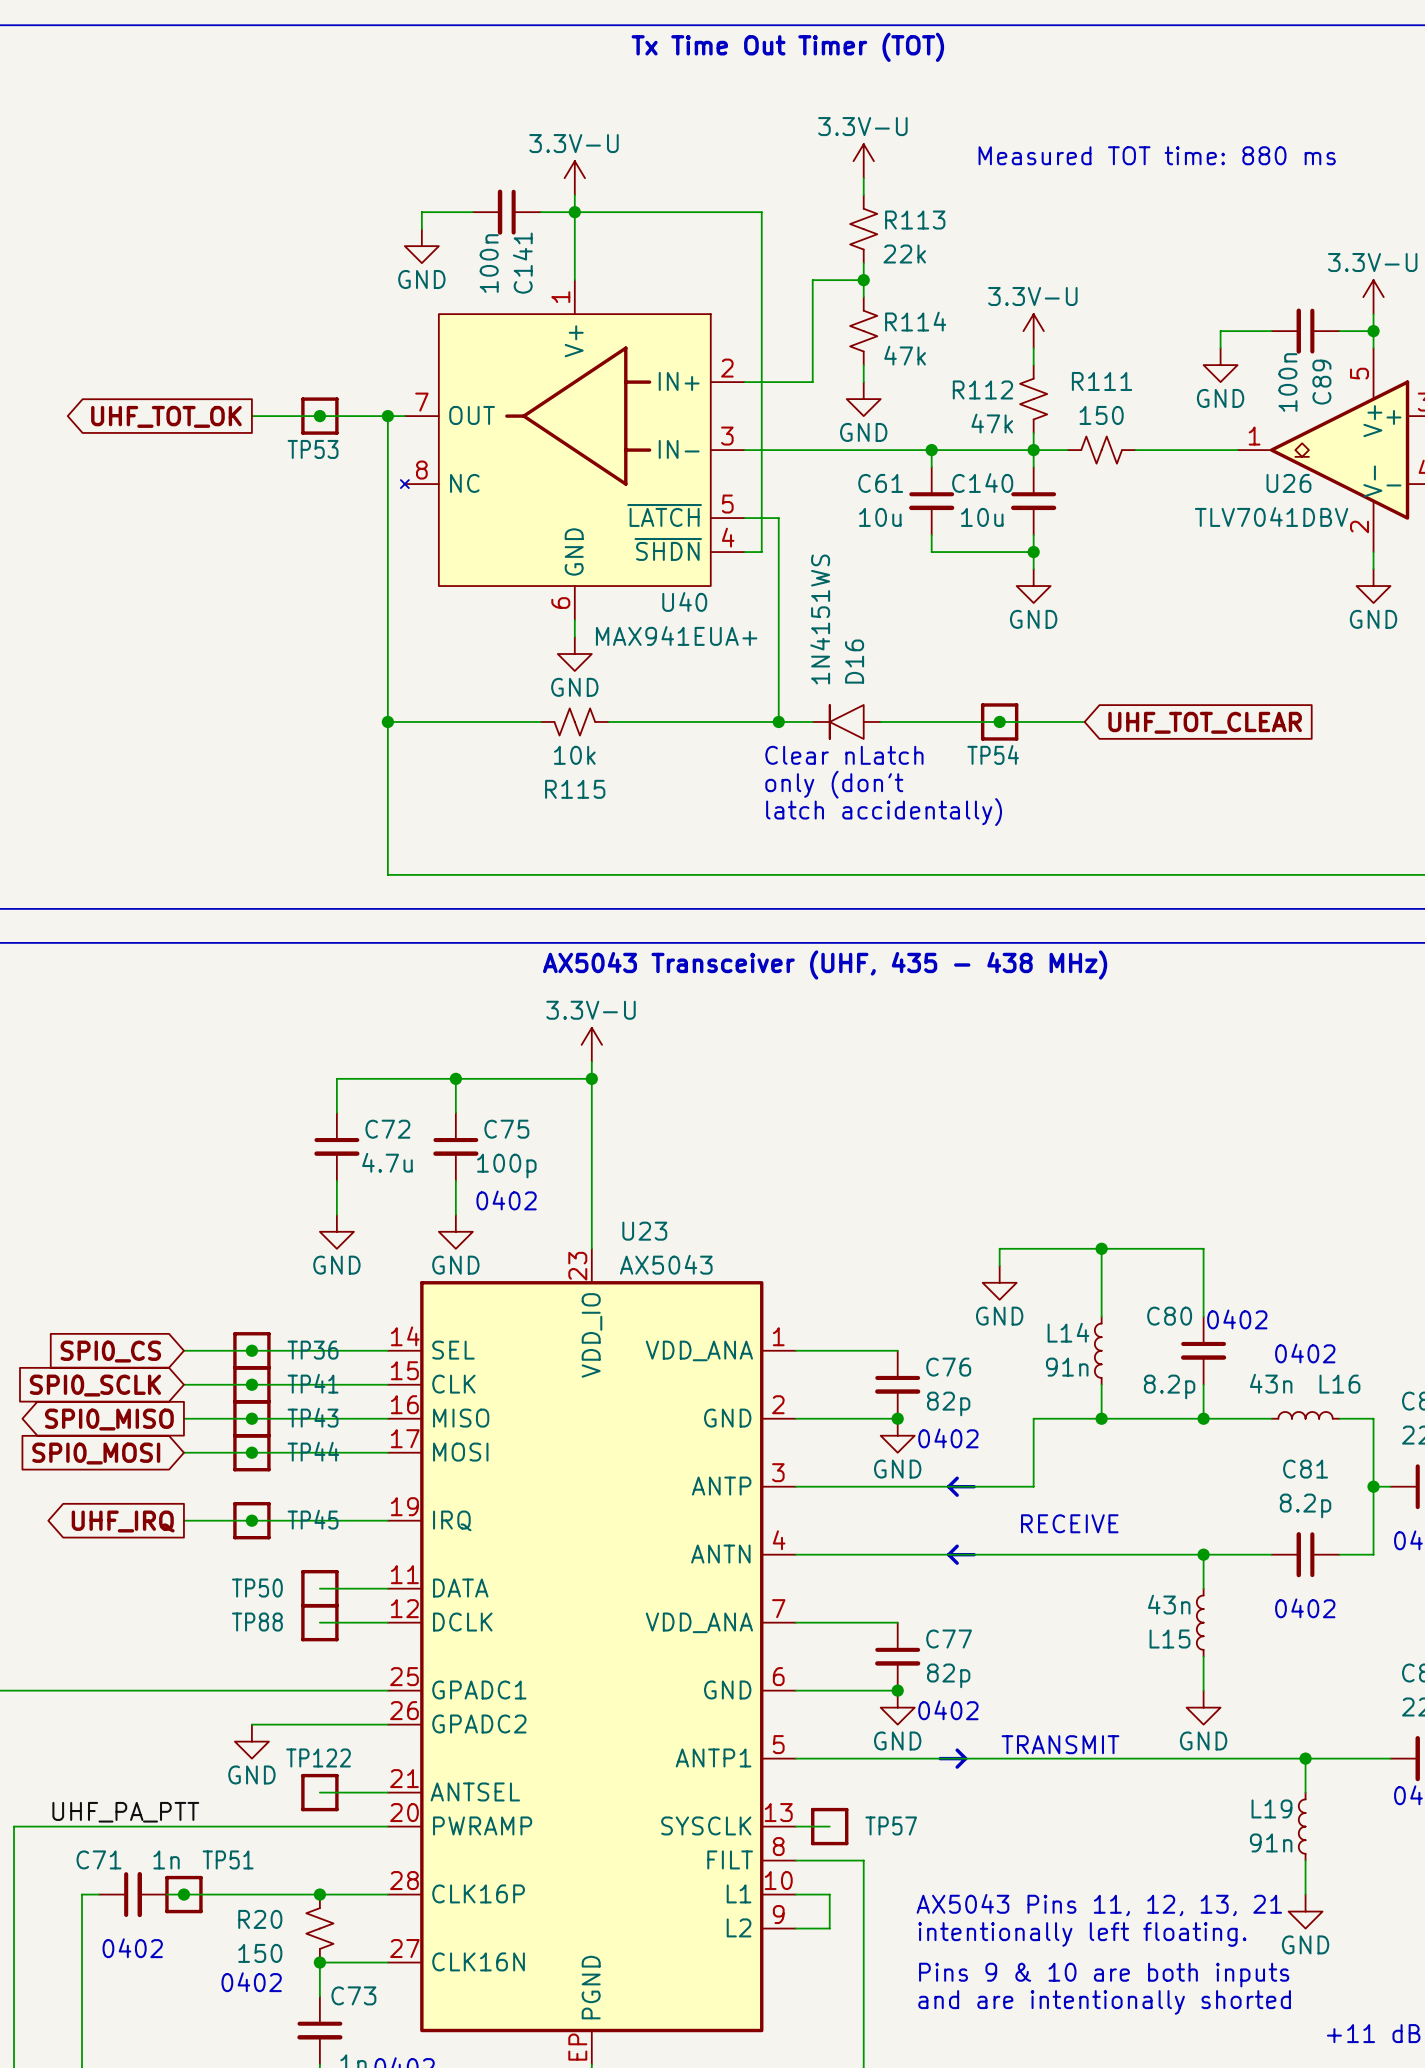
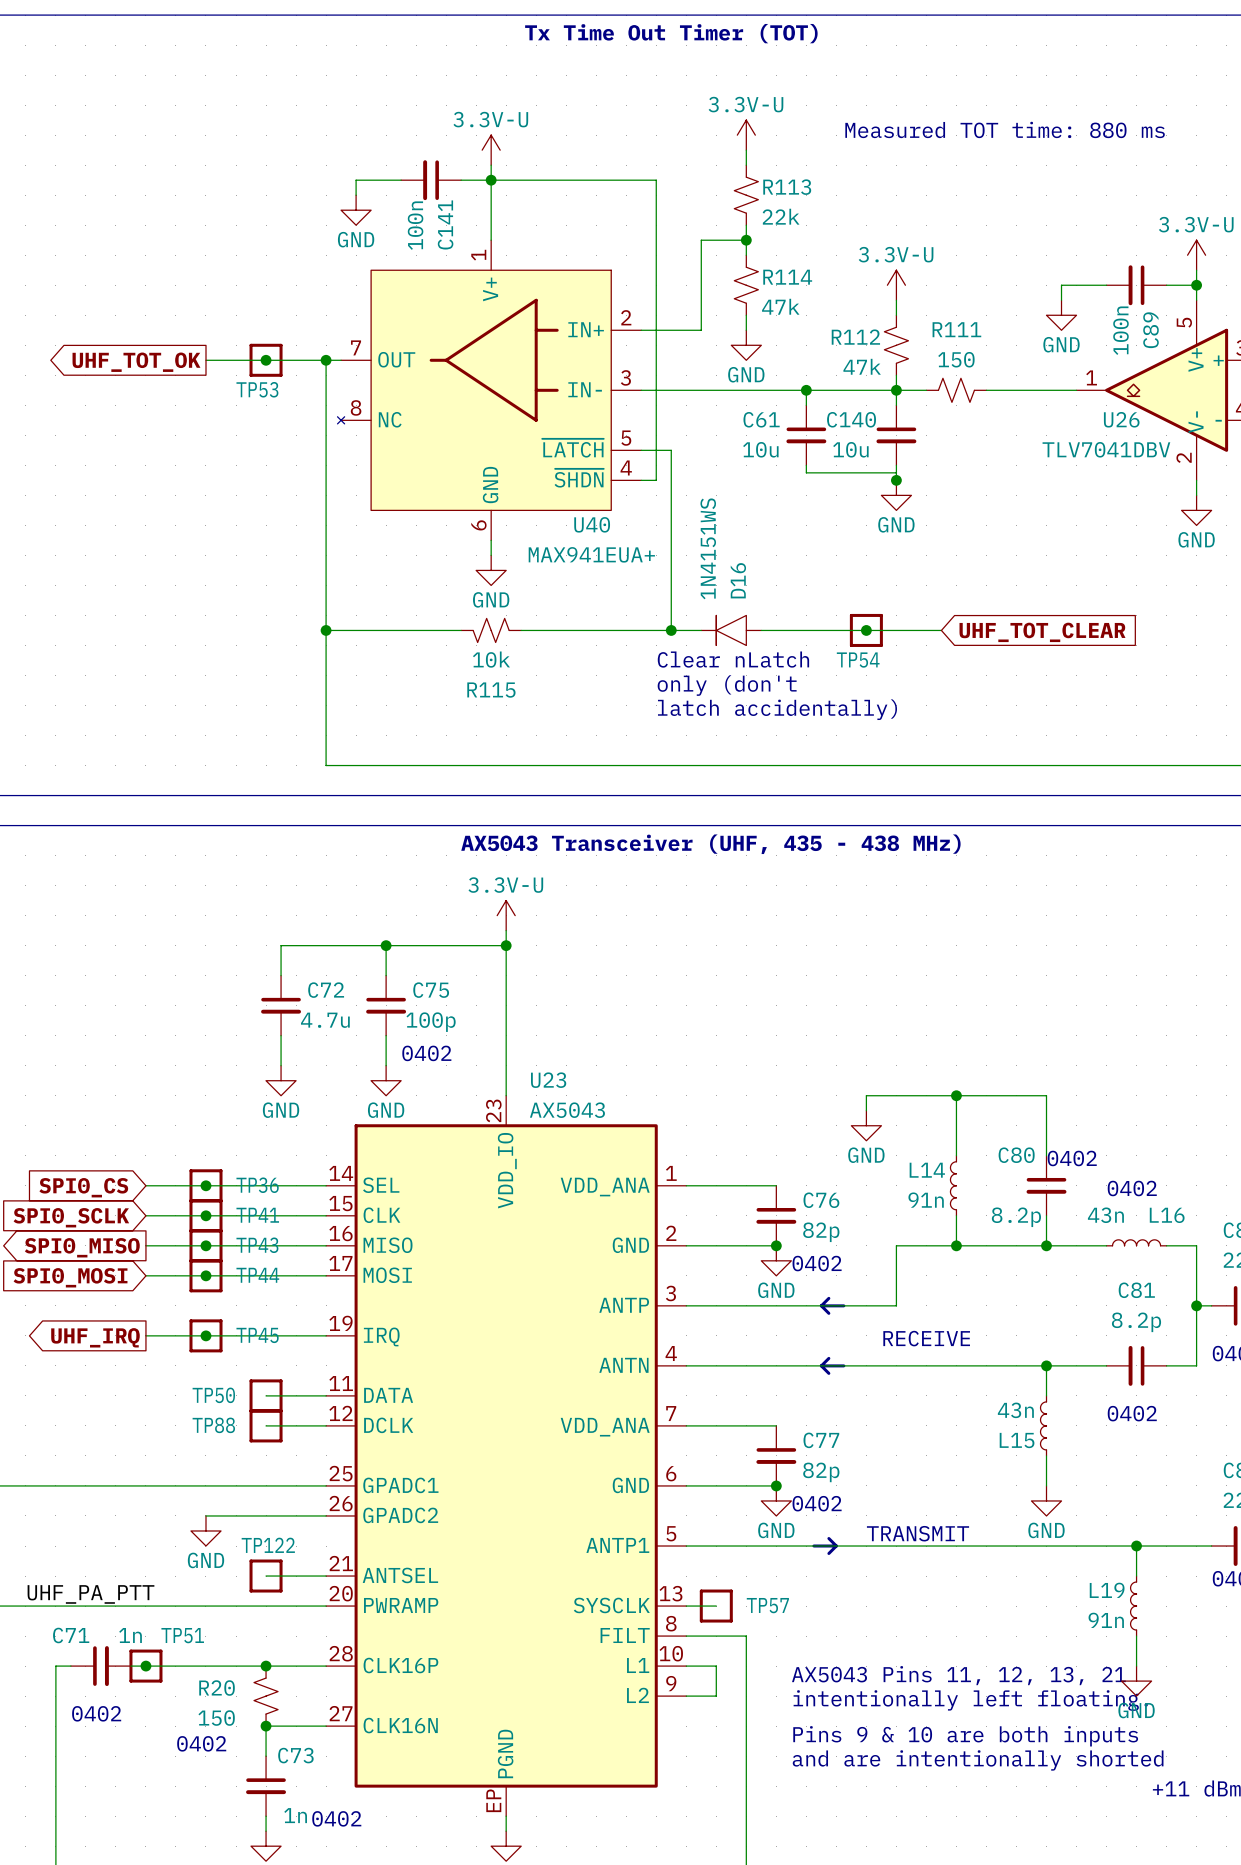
wire: (931, 543) (931, 552) (1033, 552) (1033, 569) -> (806, 472) (896, 472)
power symbol position: GND (1033, 586) -> GND (896, 495)

